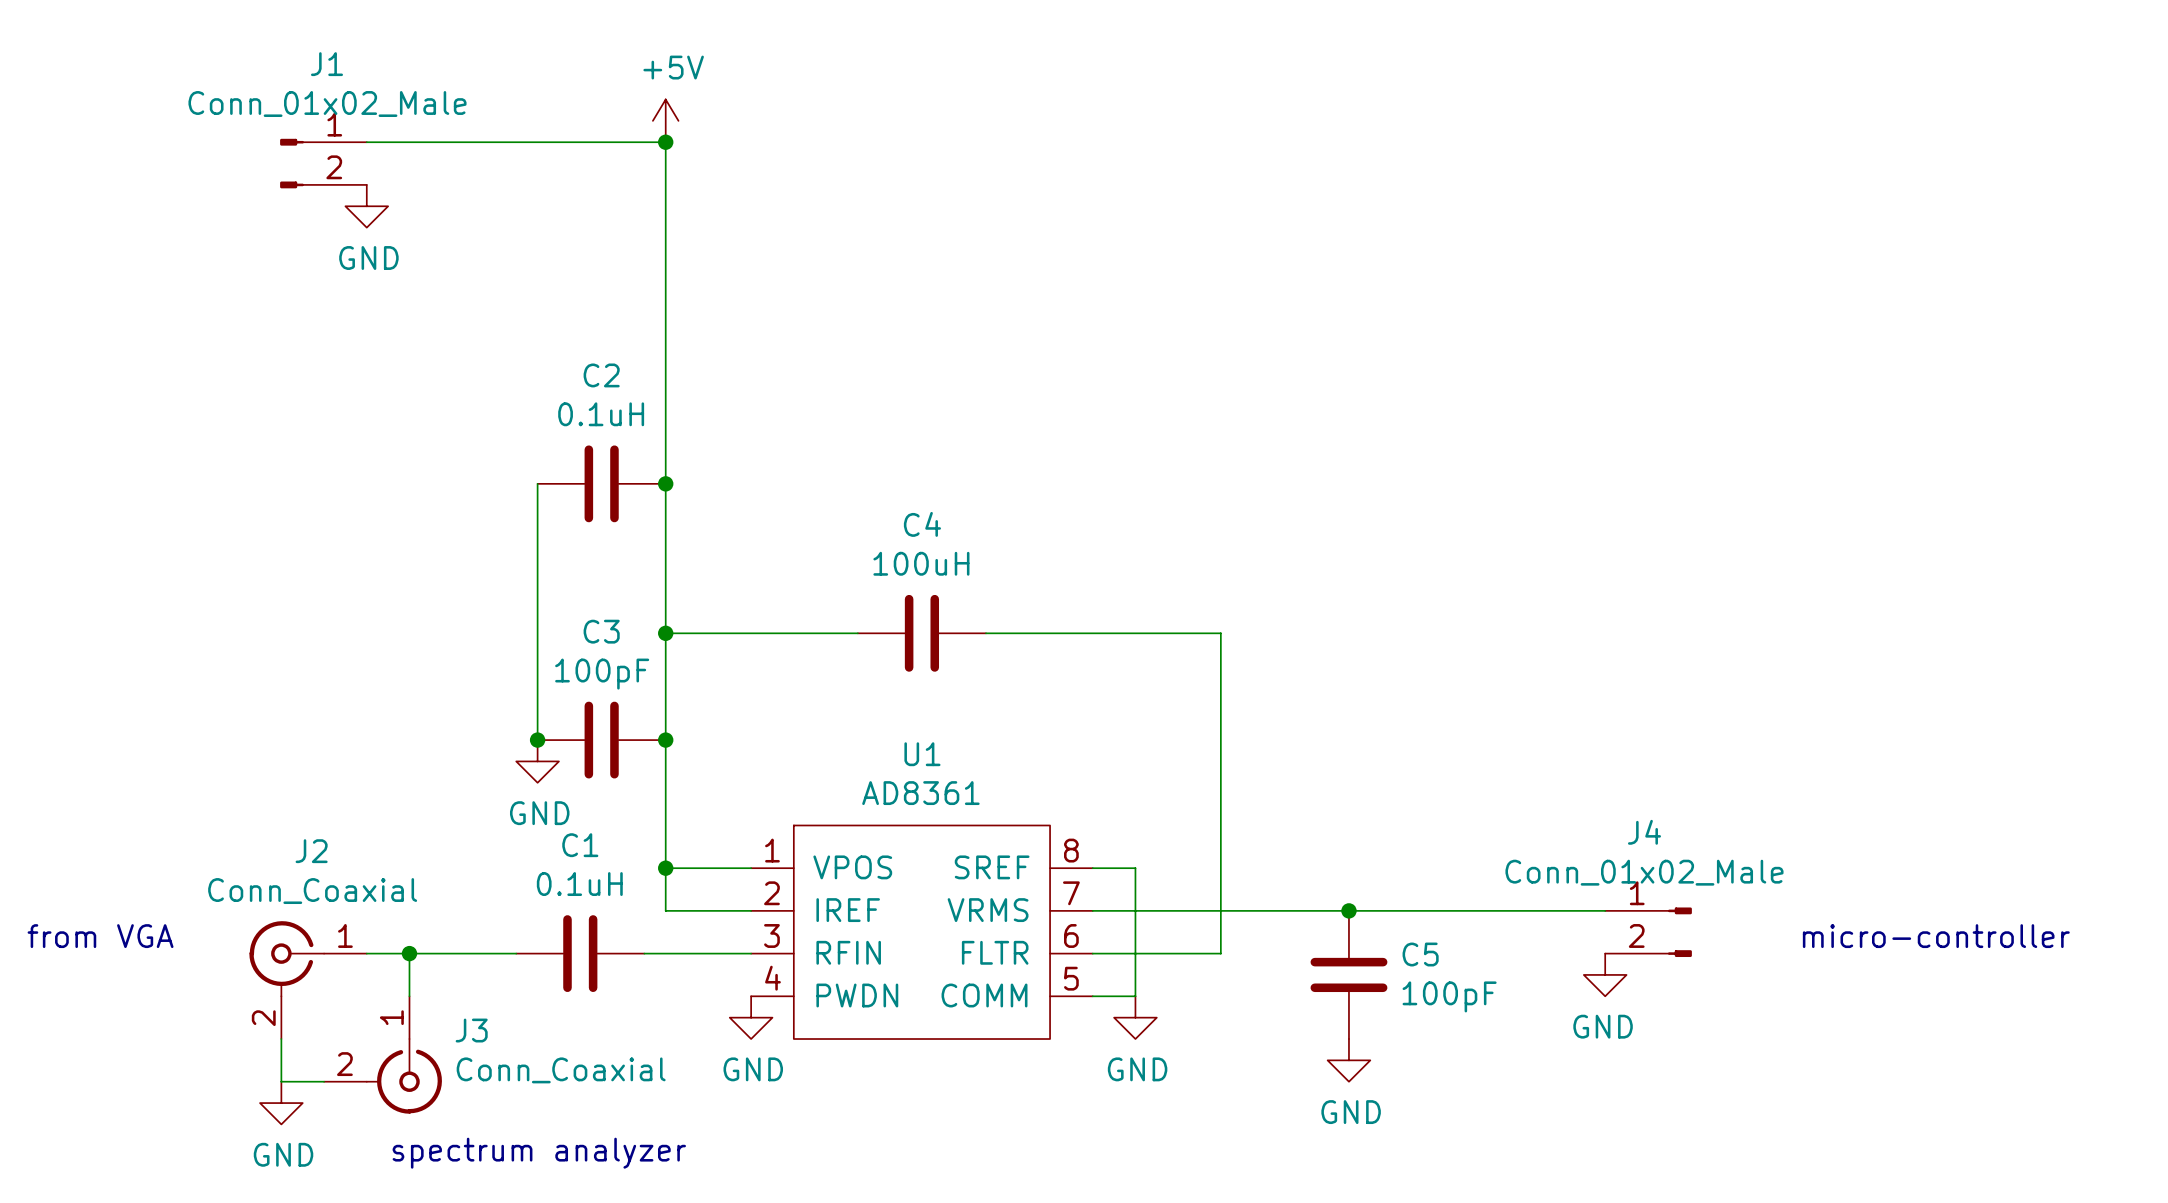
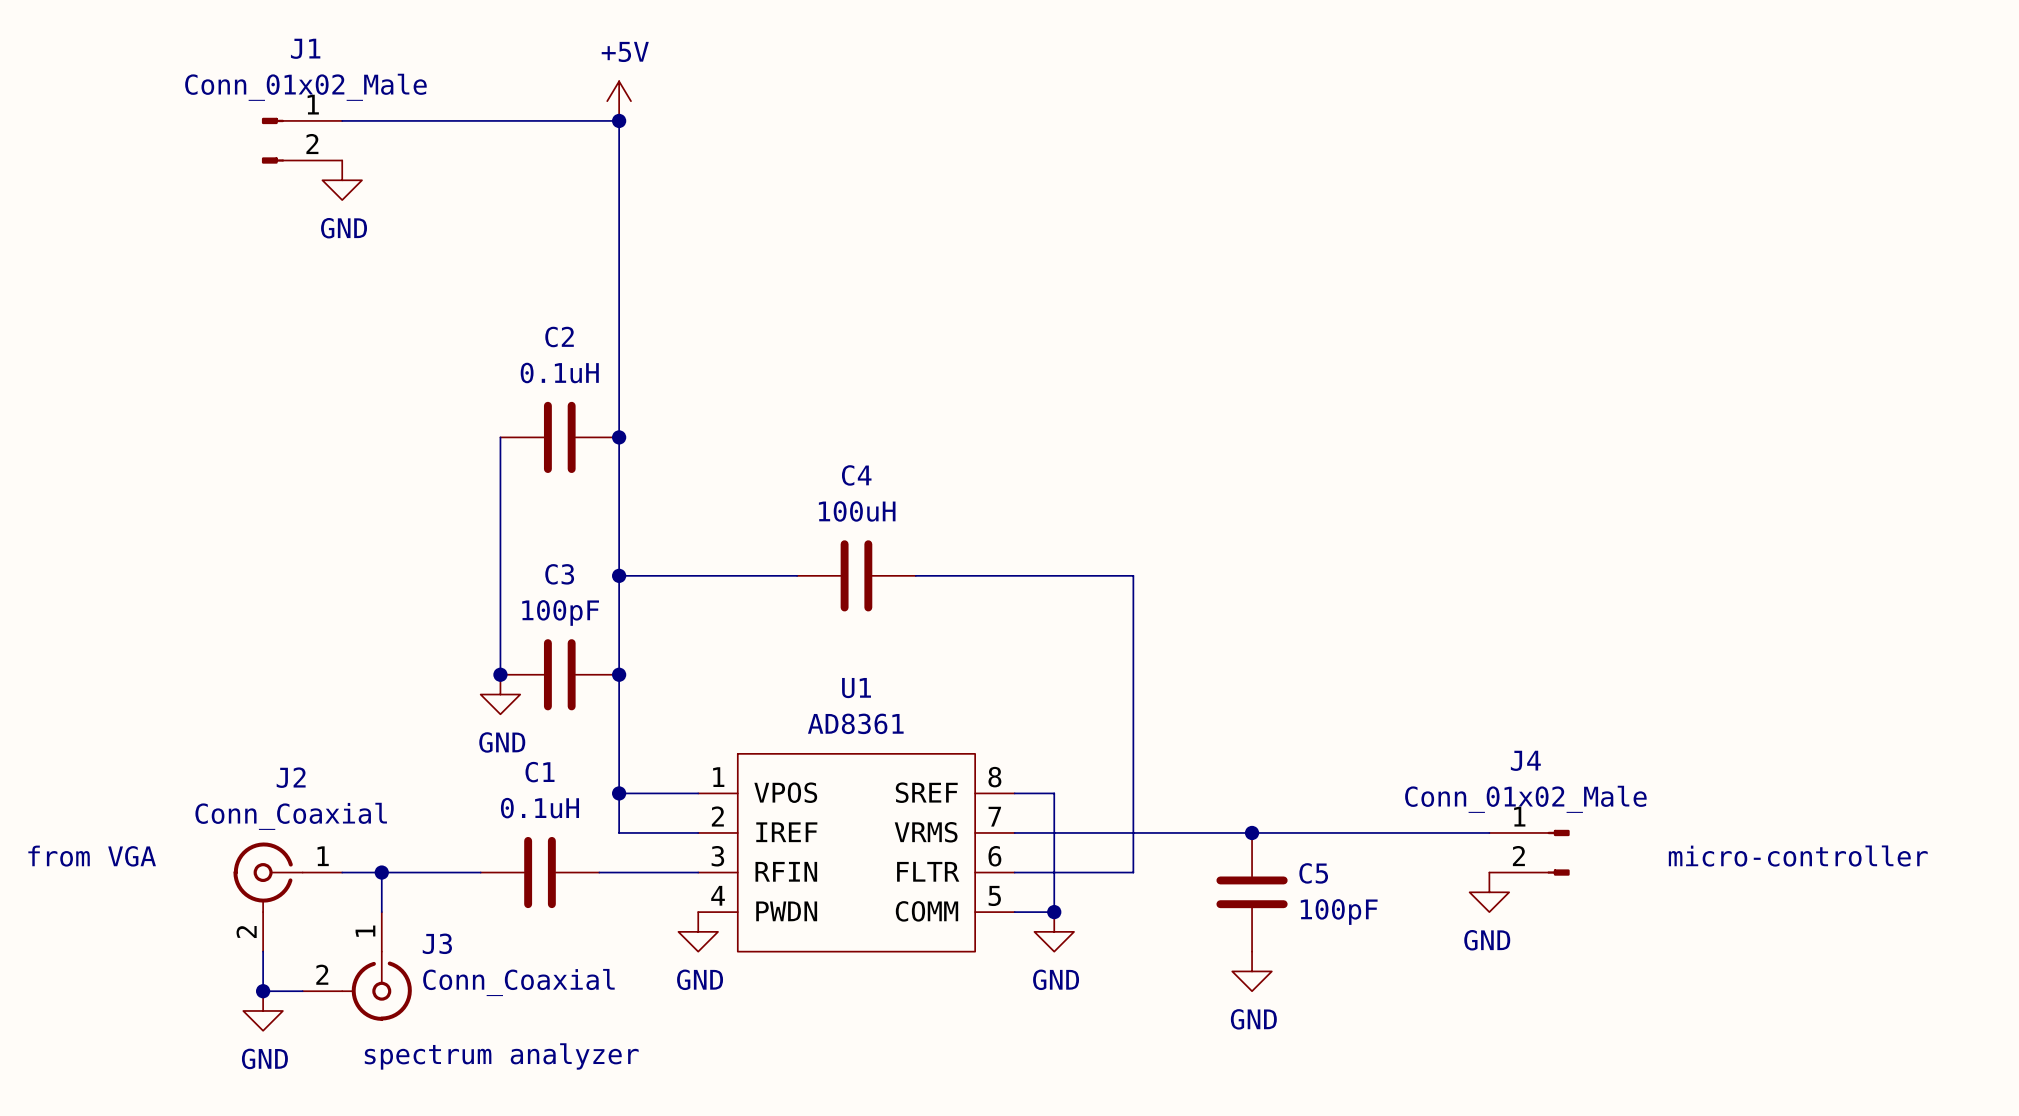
junction: none -> (1054, 912)
junction: none -> (263, 991)

